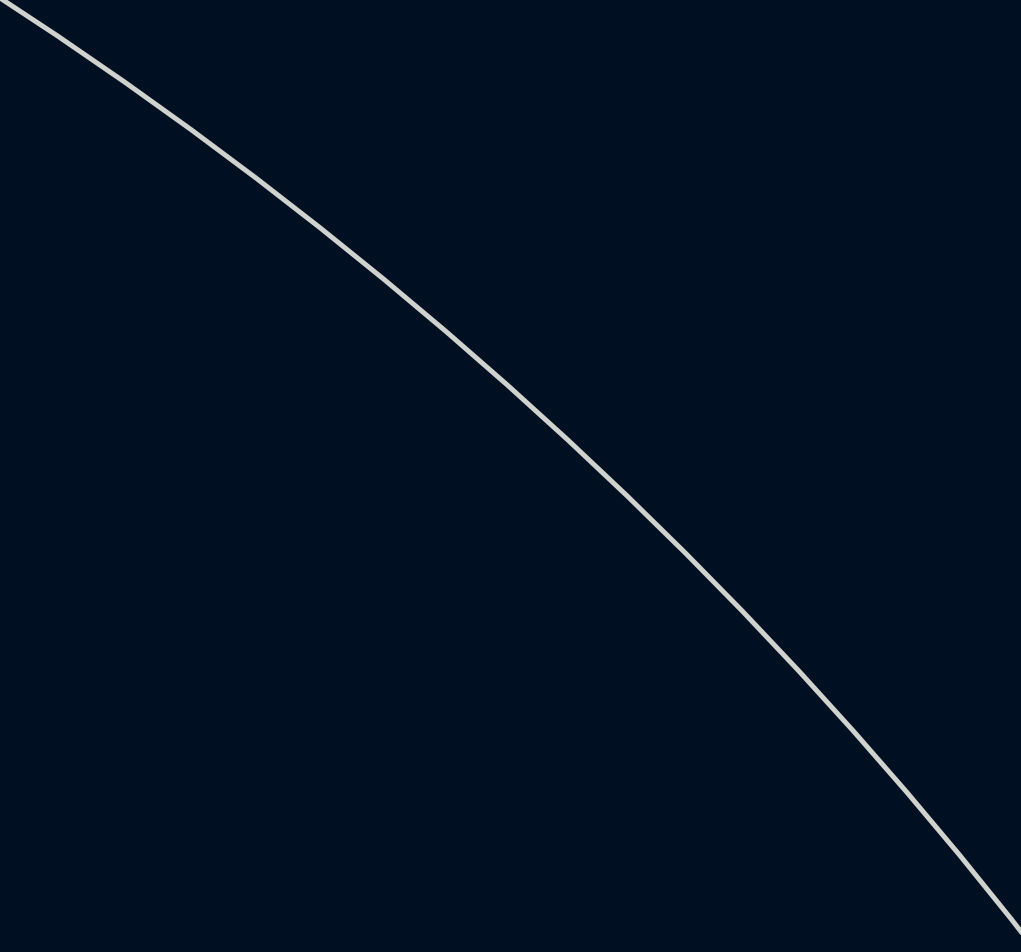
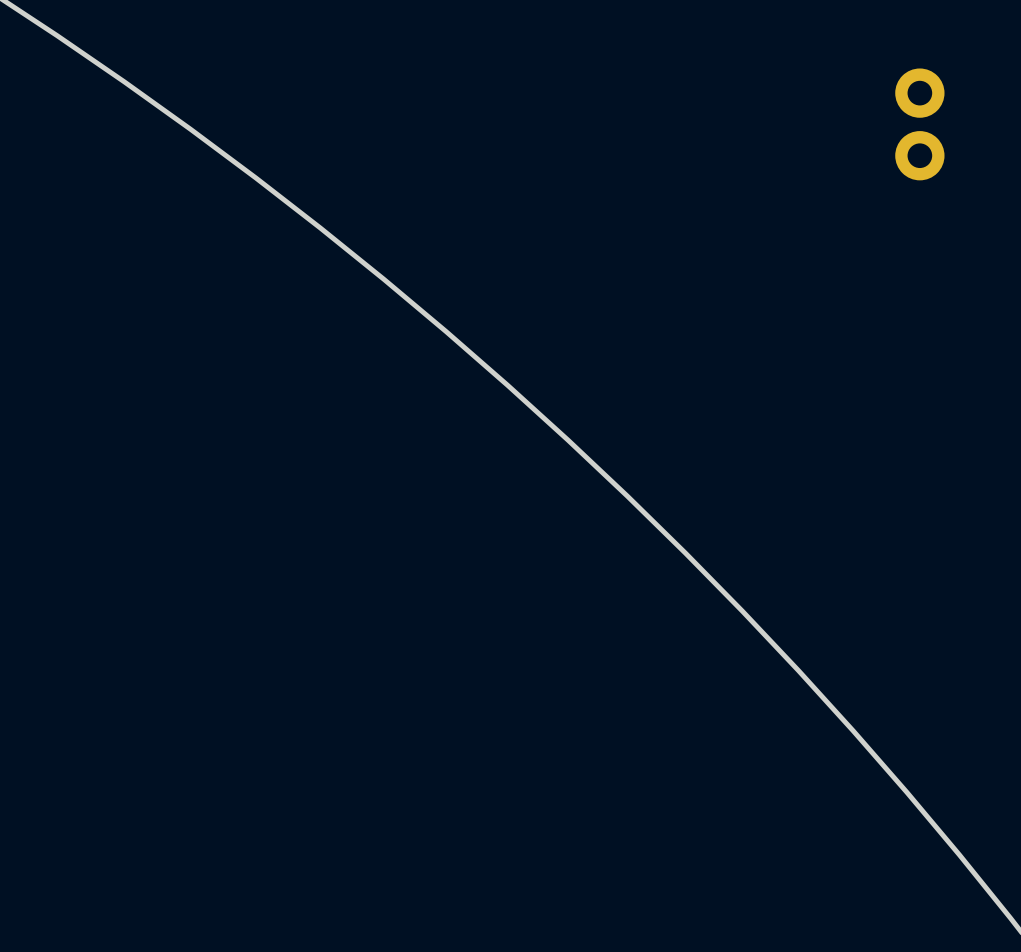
part: none -> (919, 124)

